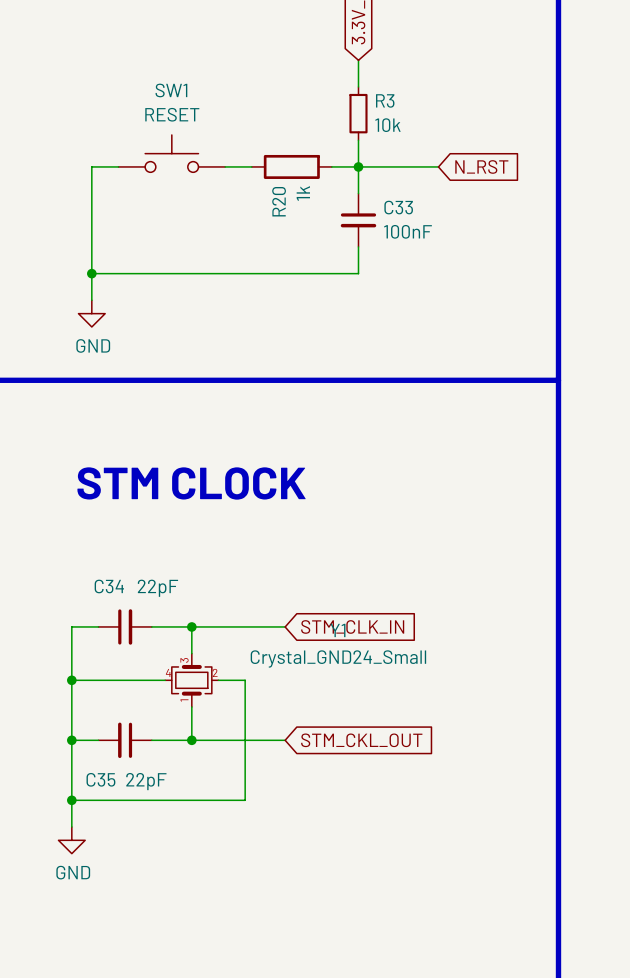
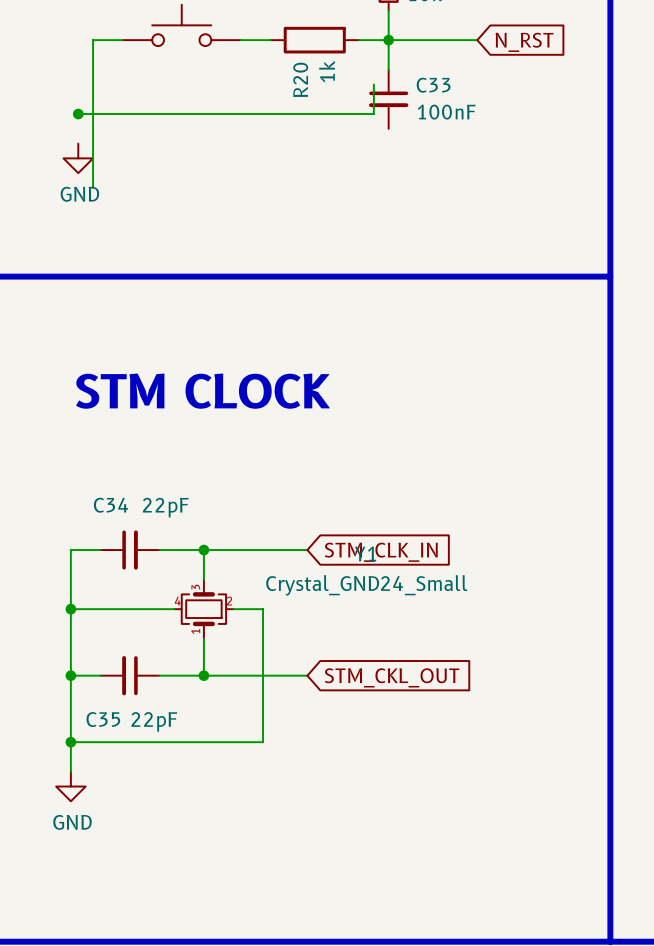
wire: (358, 246) (358, 273) (91, 273) -> (373, 84) (373, 114) (78, 114)
junction position: (91, 273) -> (78, 114)
power symbol position: GND (91, 313) -> GND (78, 158)

